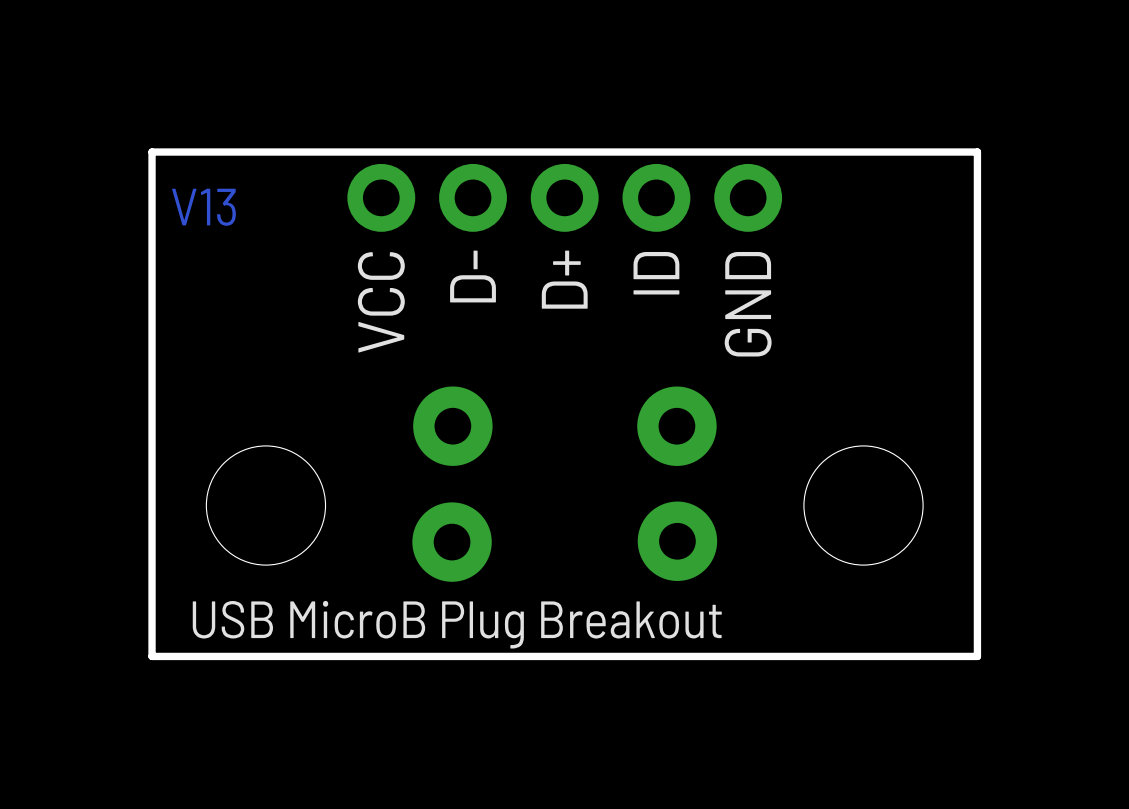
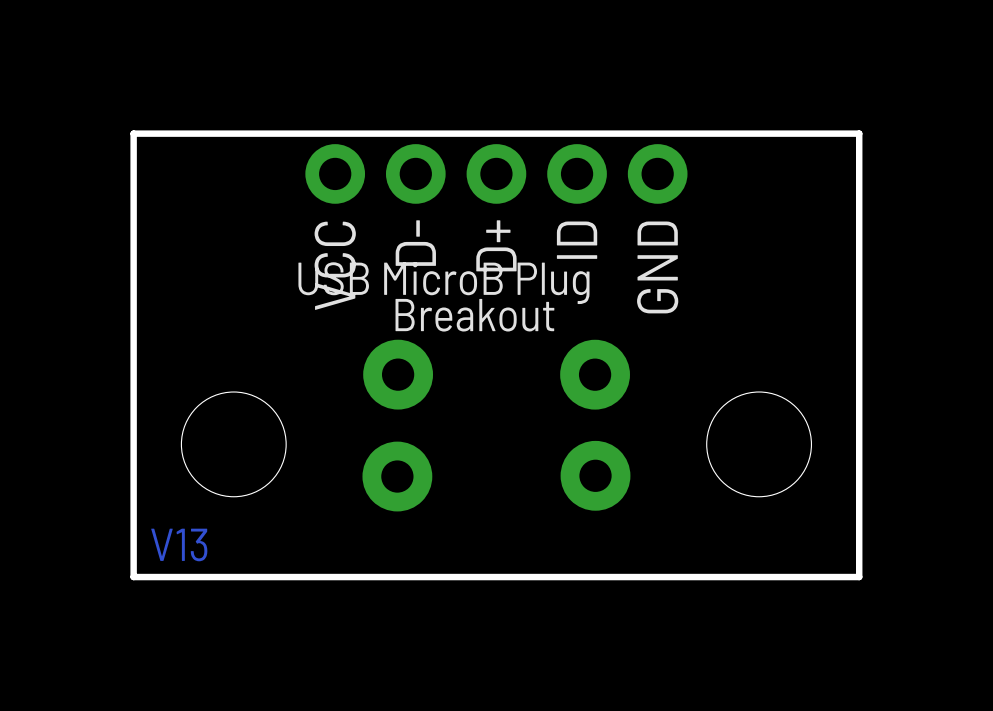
text position: V13 (203, 207) -> V13 (179, 544)
text: none -> USB MicroB Plug (443, 283)
text: none -> Breakout (474, 315)
text: USB MicroB Plug Breakout (457, 624) -> none

